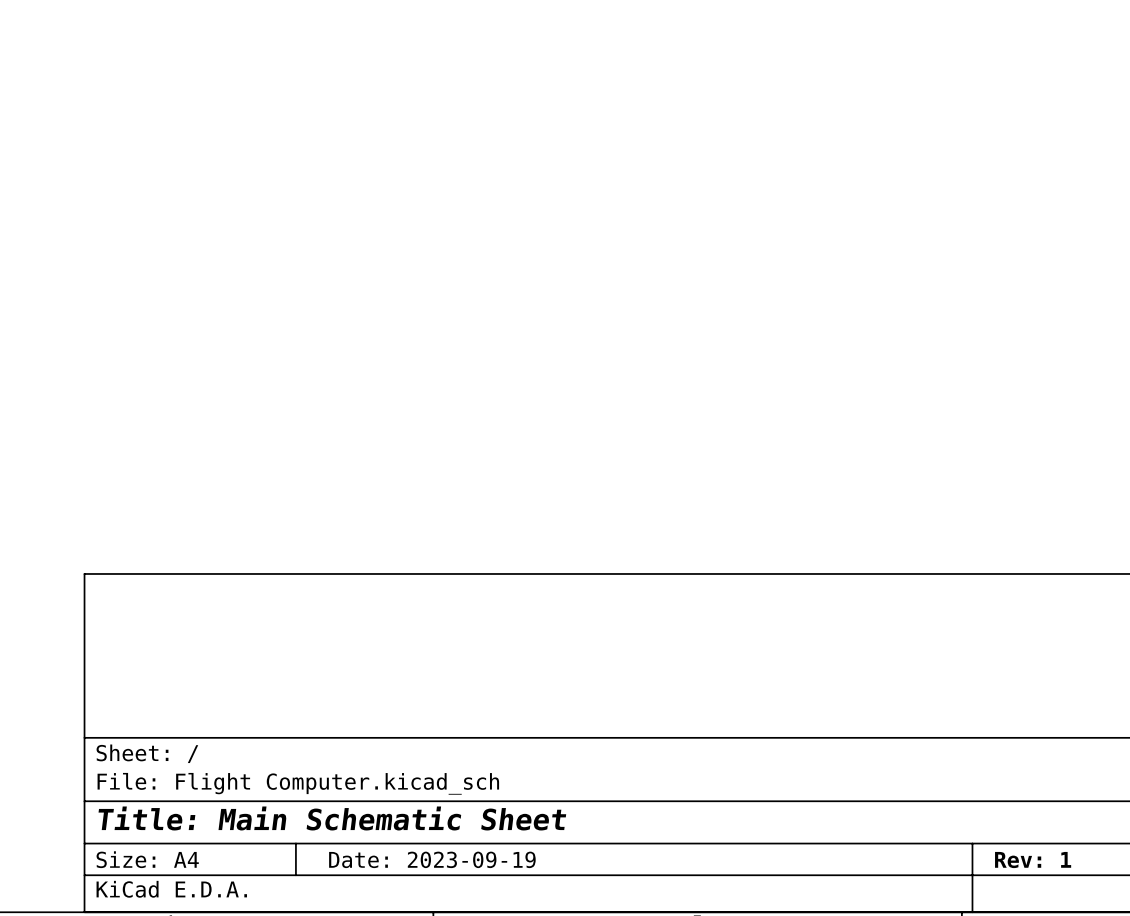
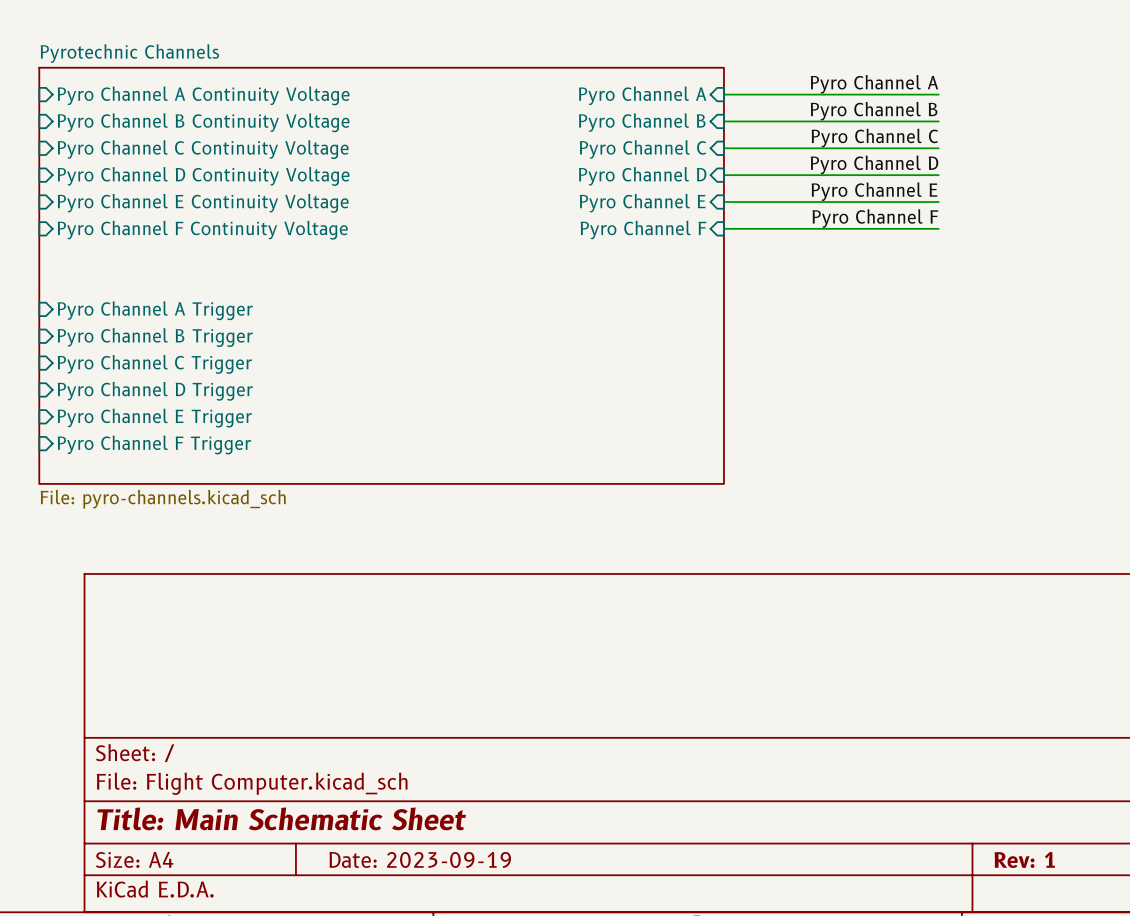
label: none -> Pyro Channel A (874, 84)
wire: none -> (723, 94) (938, 94)
sheet pin: none -> Pyro Channel A Continuity Voltage (203, 95)
sheet pin: none -> Pyro Channel A (642, 95)
label: none -> Pyro Channel B (874, 111)
wire: none -> (723, 121) (938, 121)
sheet pin: none -> Pyro Channel B Continuity Voltage (203, 122)
sheet pin: none -> Pyro Channel B (642, 122)
label: none -> Pyro Channel C (874, 137)
wire: none -> (723, 148) (938, 148)
sheet pin: none -> Pyro Channel C Continuity Voltage (203, 149)
sheet pin: none -> Pyro Channel C (643, 149)
label: none -> Pyro Channel D (874, 164)
wire: none -> (723, 175) (938, 175)
sheet pin: none -> Pyro Channel D Continuity Voltage (203, 176)
sheet pin: none -> Pyro Channel D (642, 176)
label: none -> Pyro Channel E (874, 191)
wire: none -> (723, 202) (938, 202)
sheet pin: none -> Pyro Channel E Continuity Voltage (203, 203)
sheet pin: none -> Pyro Channel E (642, 203)
label: none -> Pyro Channel F (875, 218)
wire: none -> (723, 228) (938, 228)
sheet pin: none -> Pyro Channel F Continuity Voltage (202, 230)
sheet pin: none -> Pyro Channel F (643, 230)
sheet Pyrotechnic Channels: none -> File: pyro-channels.kicad_sch (381, 275)
sheet pin: none -> Pyro Channel A Trigger (155, 310)
sheet pin: none -> Pyro Channel B Trigger (155, 337)
sheet pin: none -> Pyro Channel C Trigger (154, 364)
sheet pin: none -> Pyro Channel D Trigger (155, 391)
sheet pin: none -> Pyro Channel E Trigger (154, 418)
sheet pin: none -> Pyro Channel F Trigger (154, 444)

